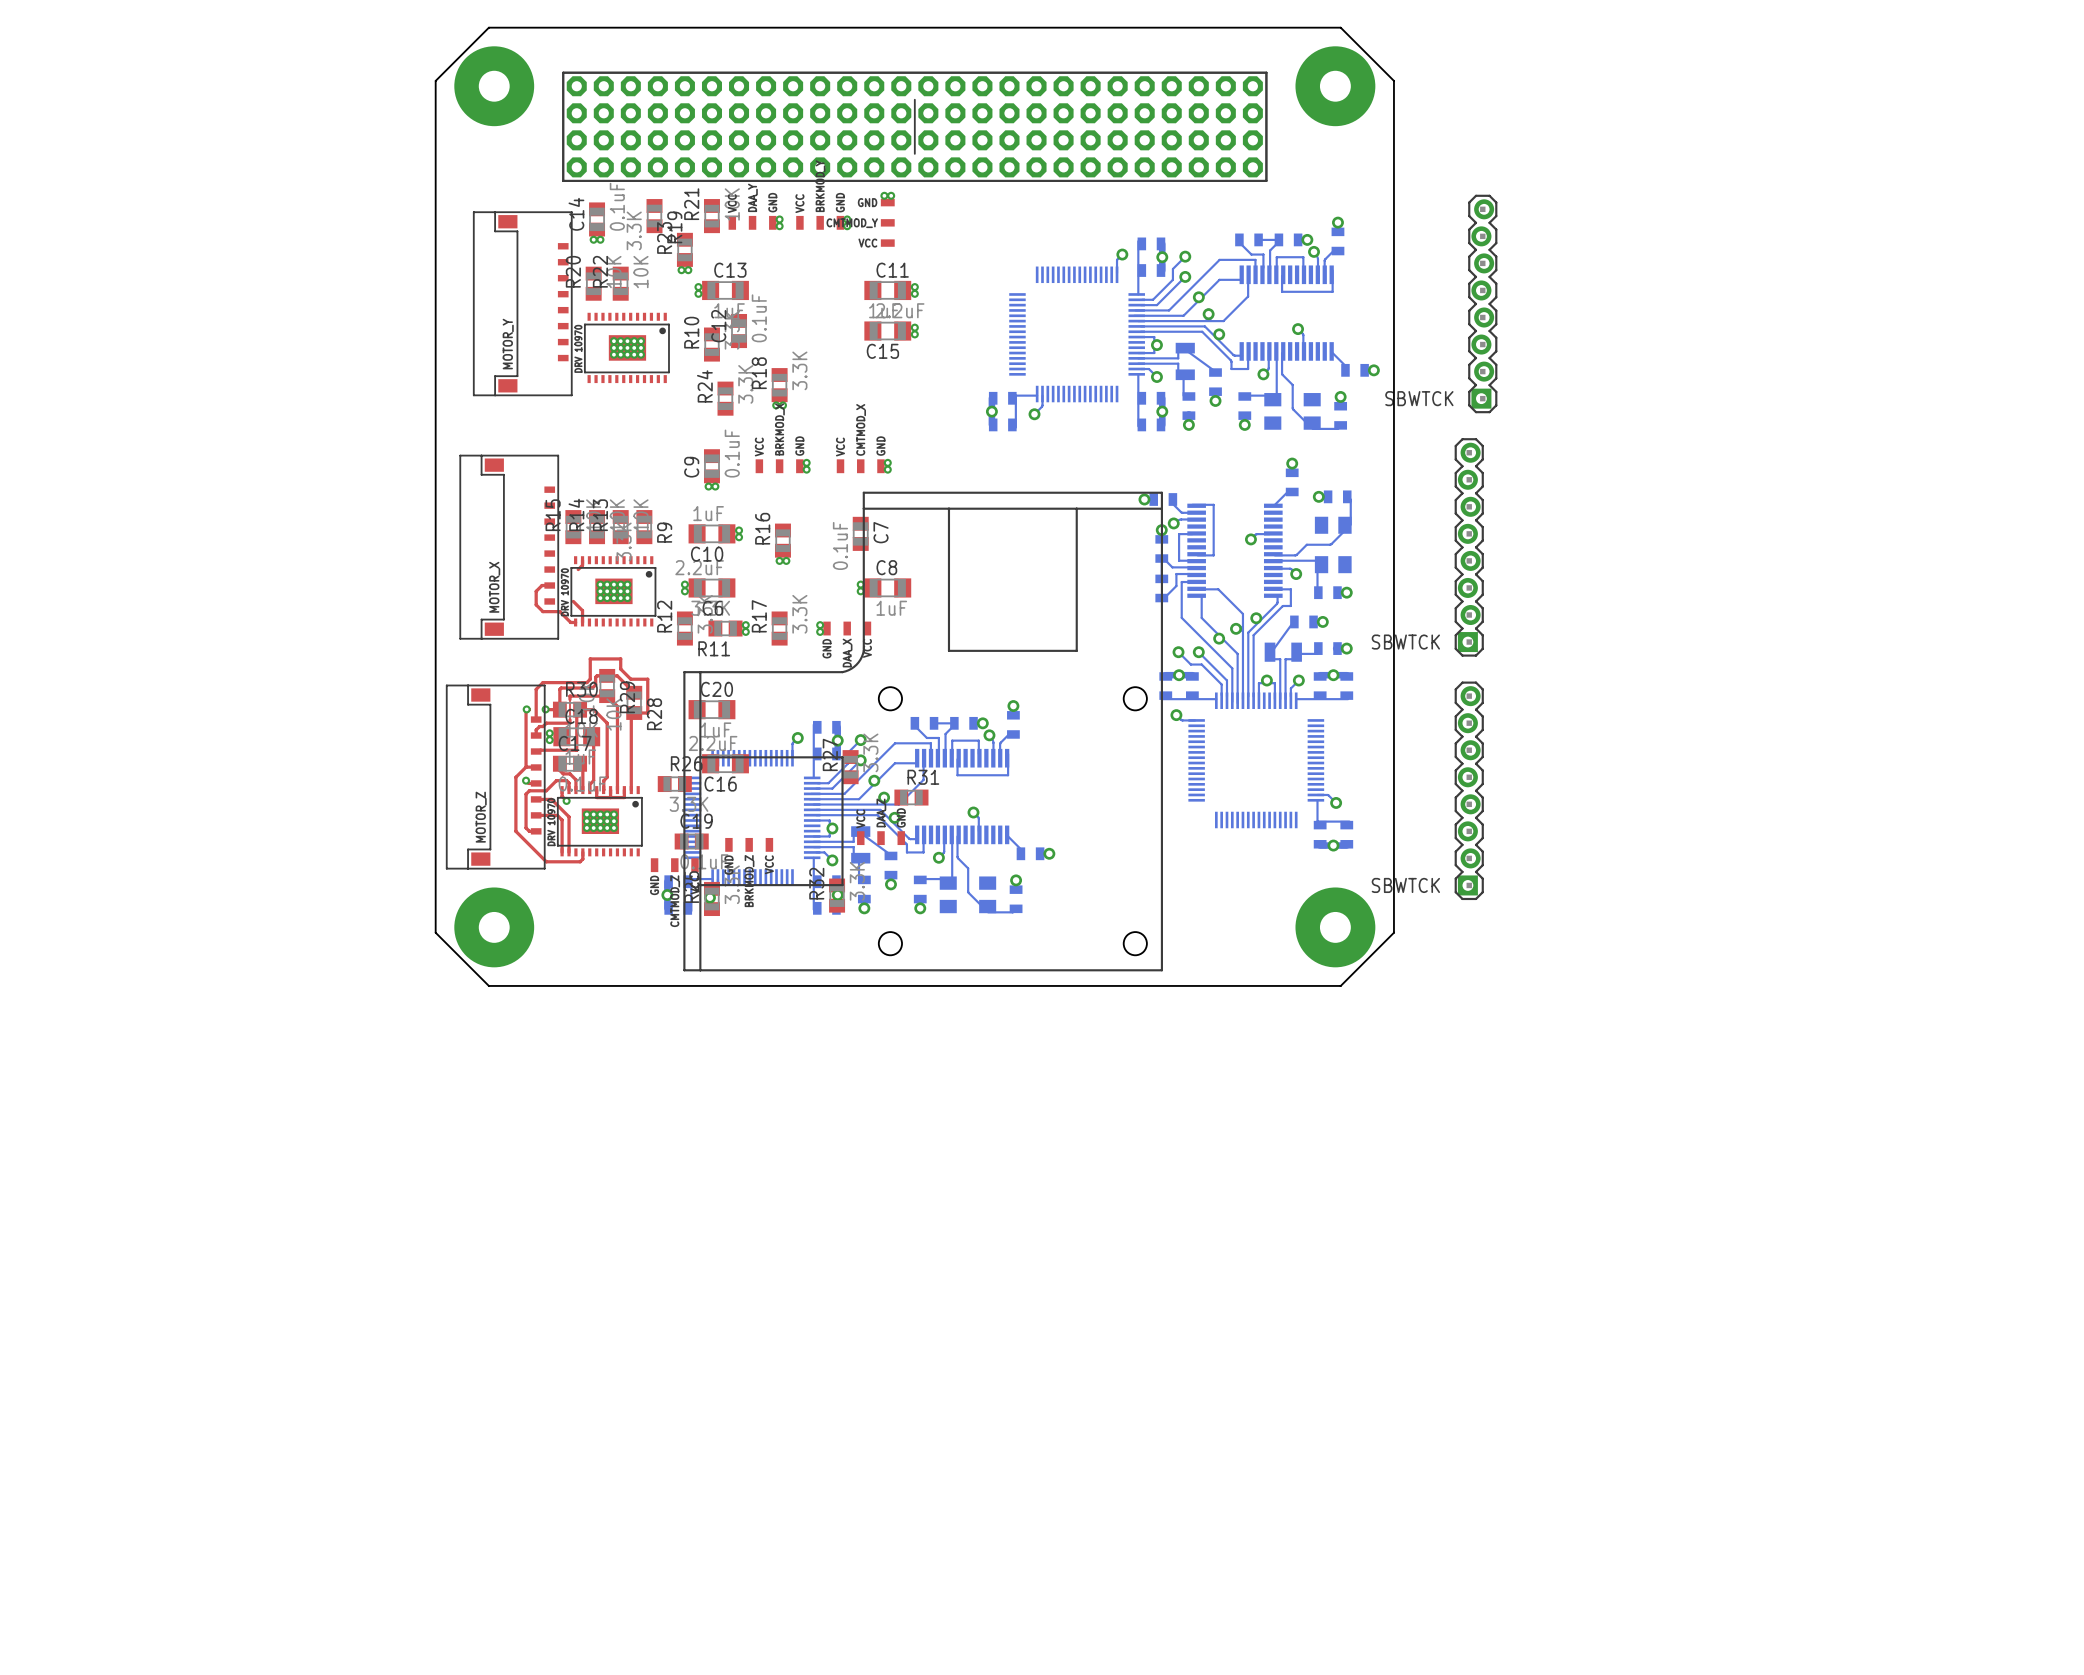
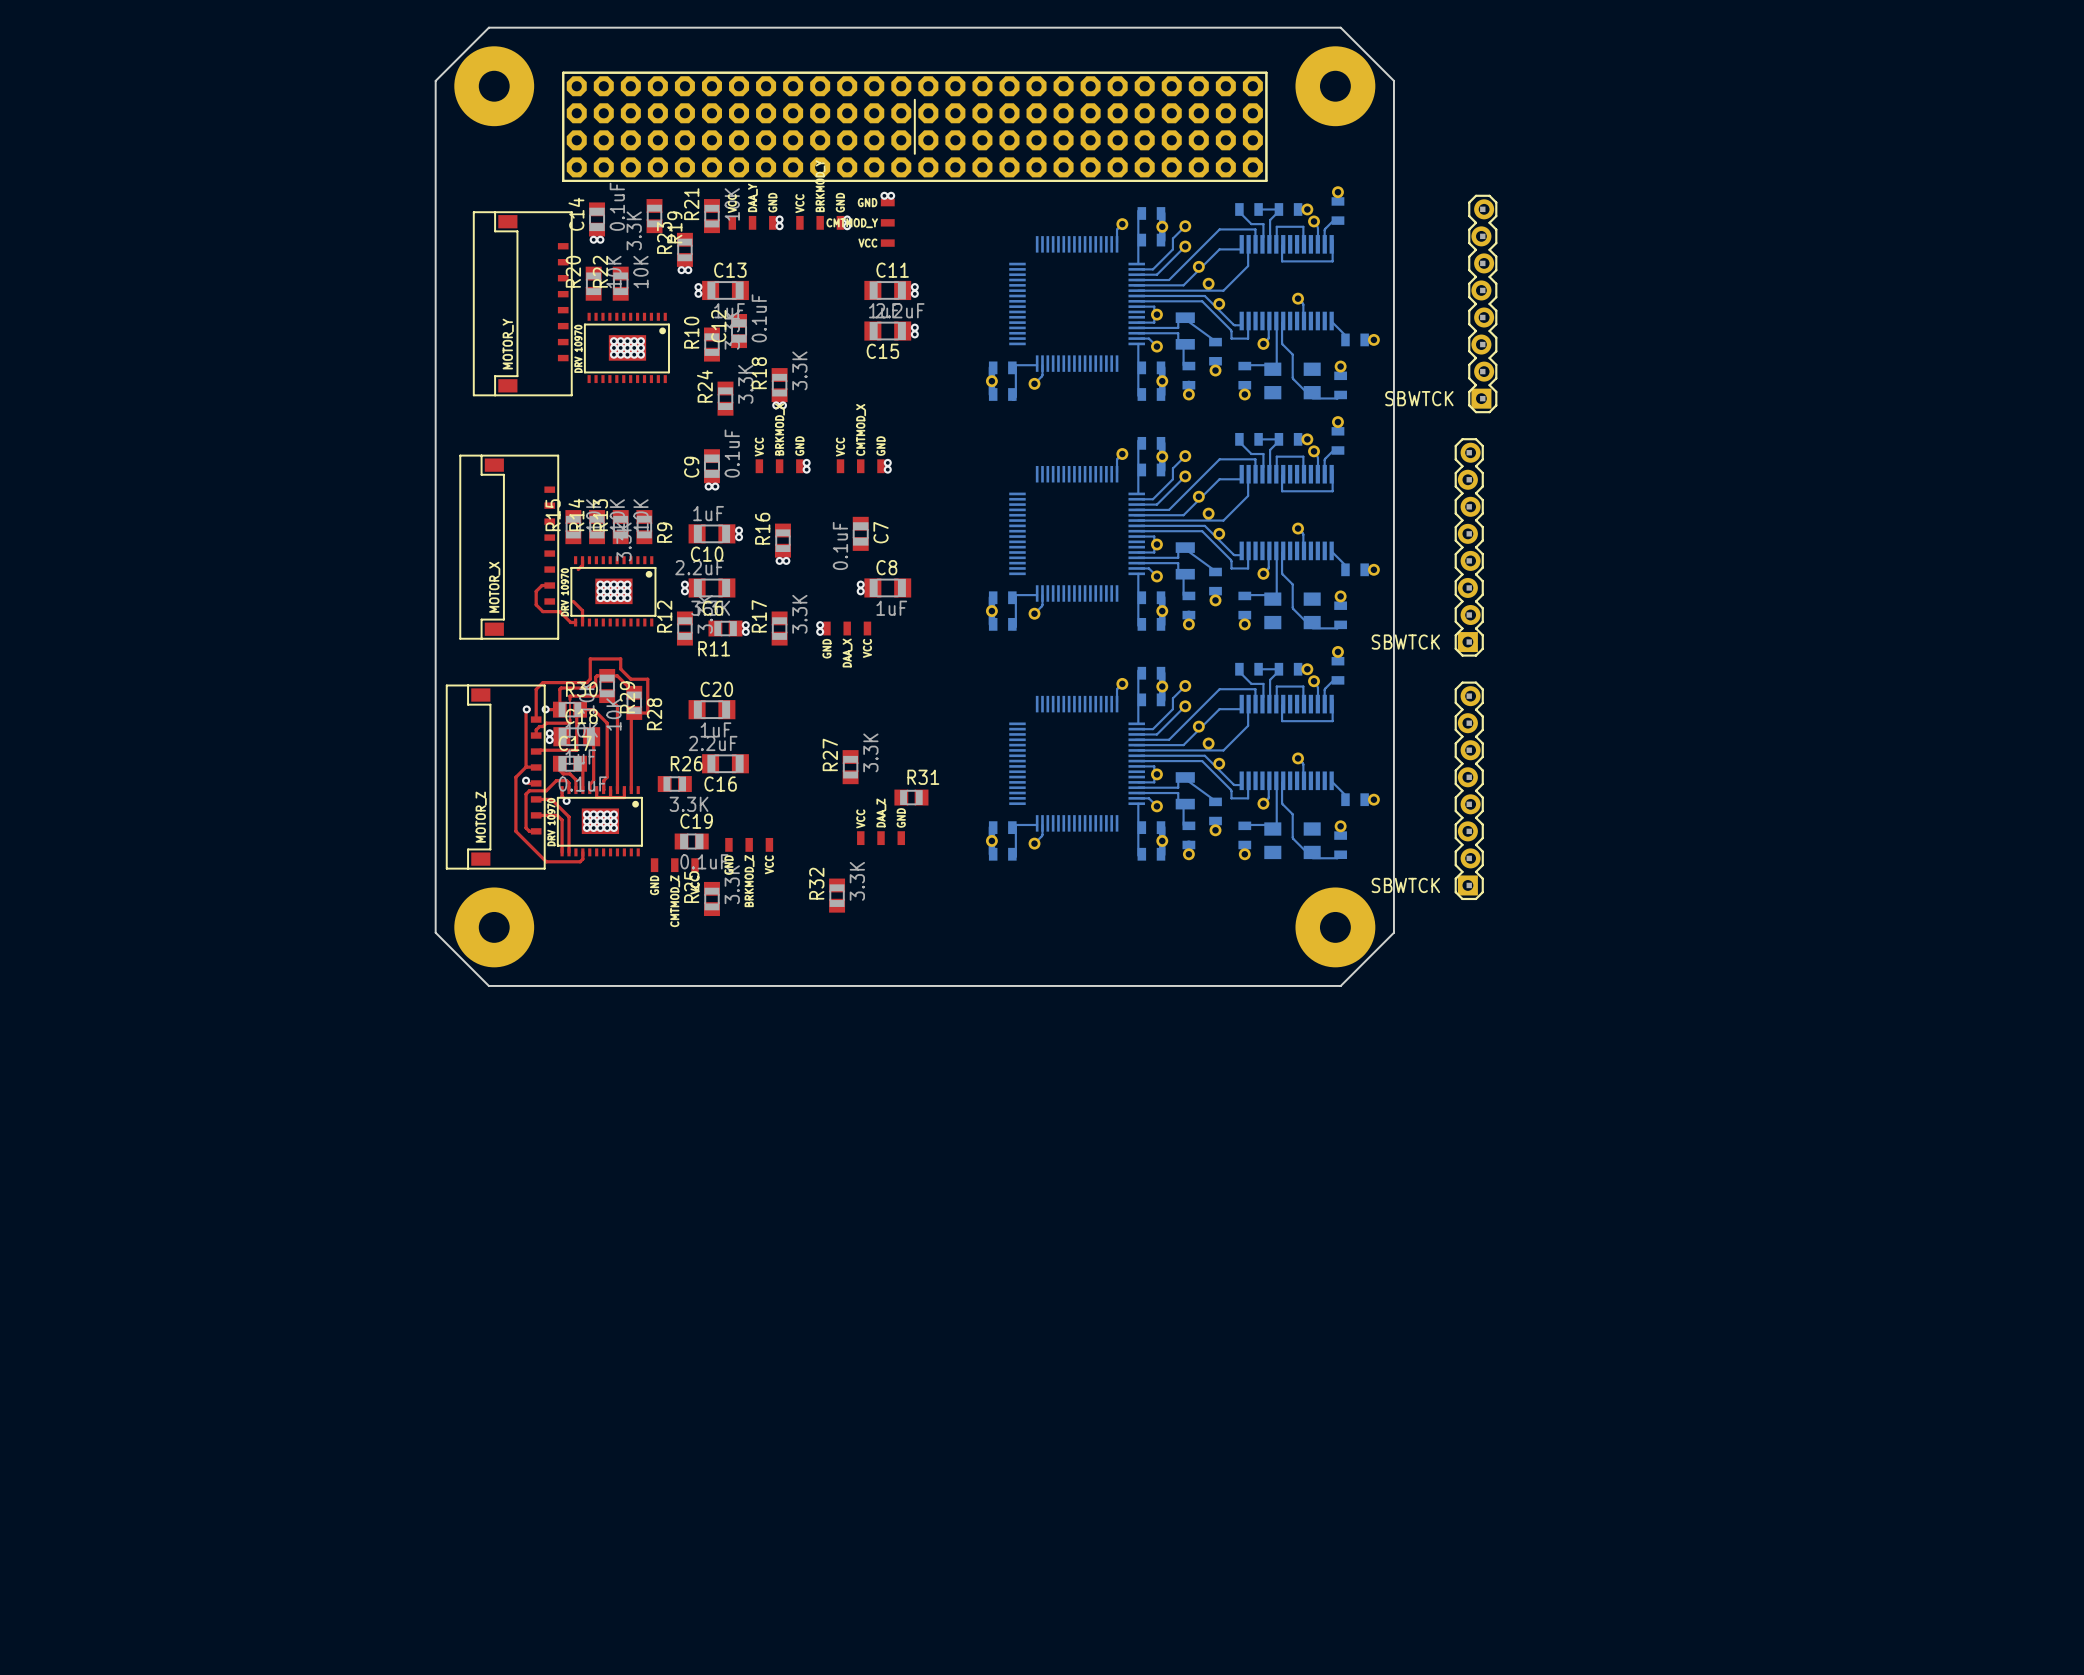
part position: (1182, 323) -> (1182, 293)
part: none -> (1182, 523)
part: (1245, 654) -> none
part: (923, 731) -> none
part: none -> (1182, 753)
part: (858, 807) -> none

